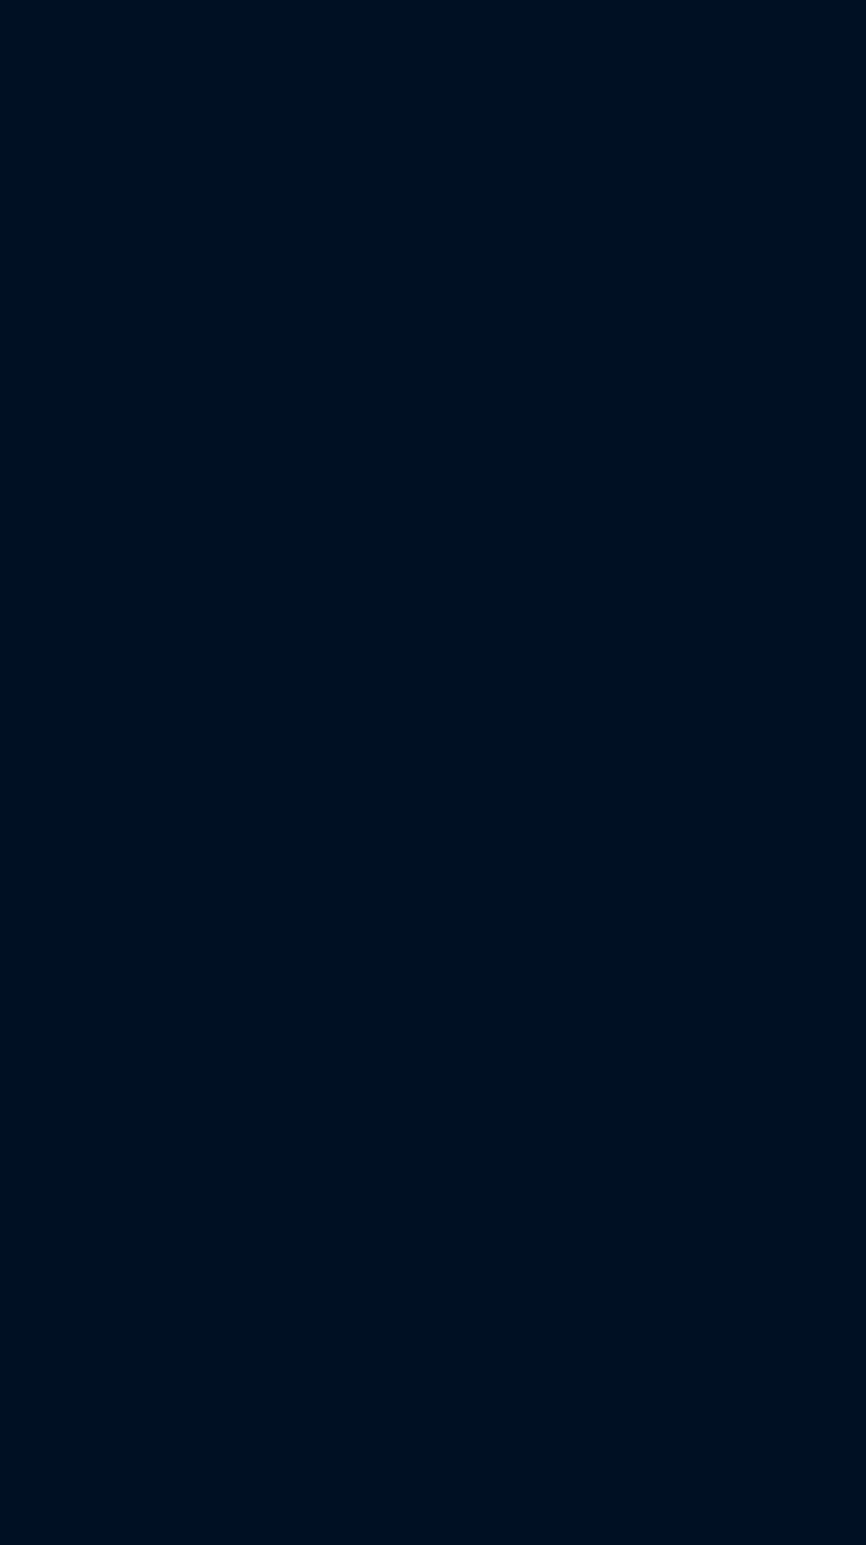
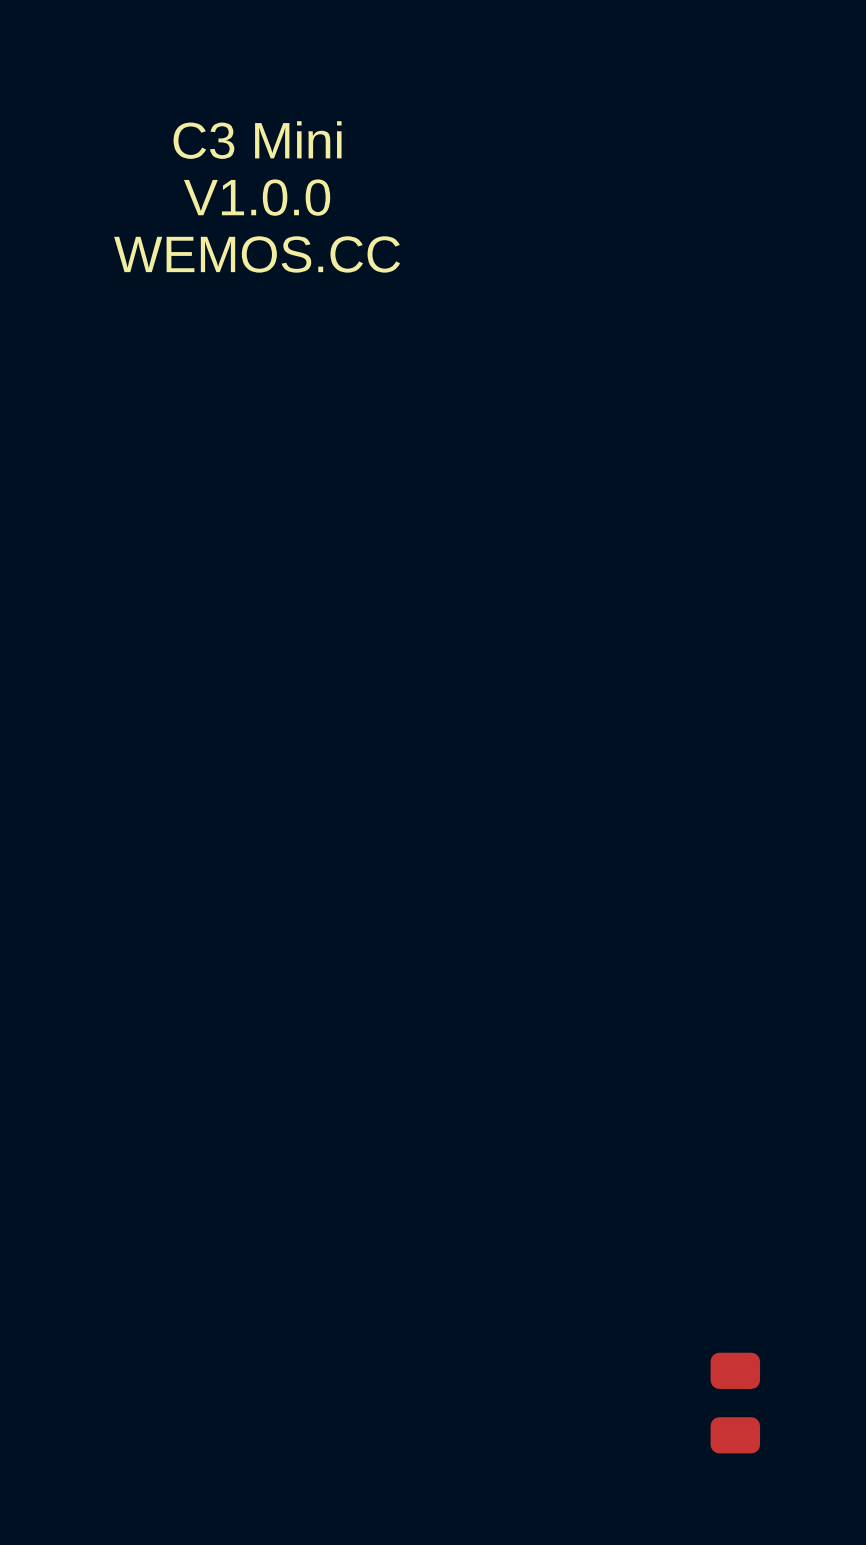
text: none -> C3 Mini (257, 140)
text: none -> V1.0.0 (257, 197)
text: none -> WEMOS.CC (257, 254)
part: none -> (735, 1403)

